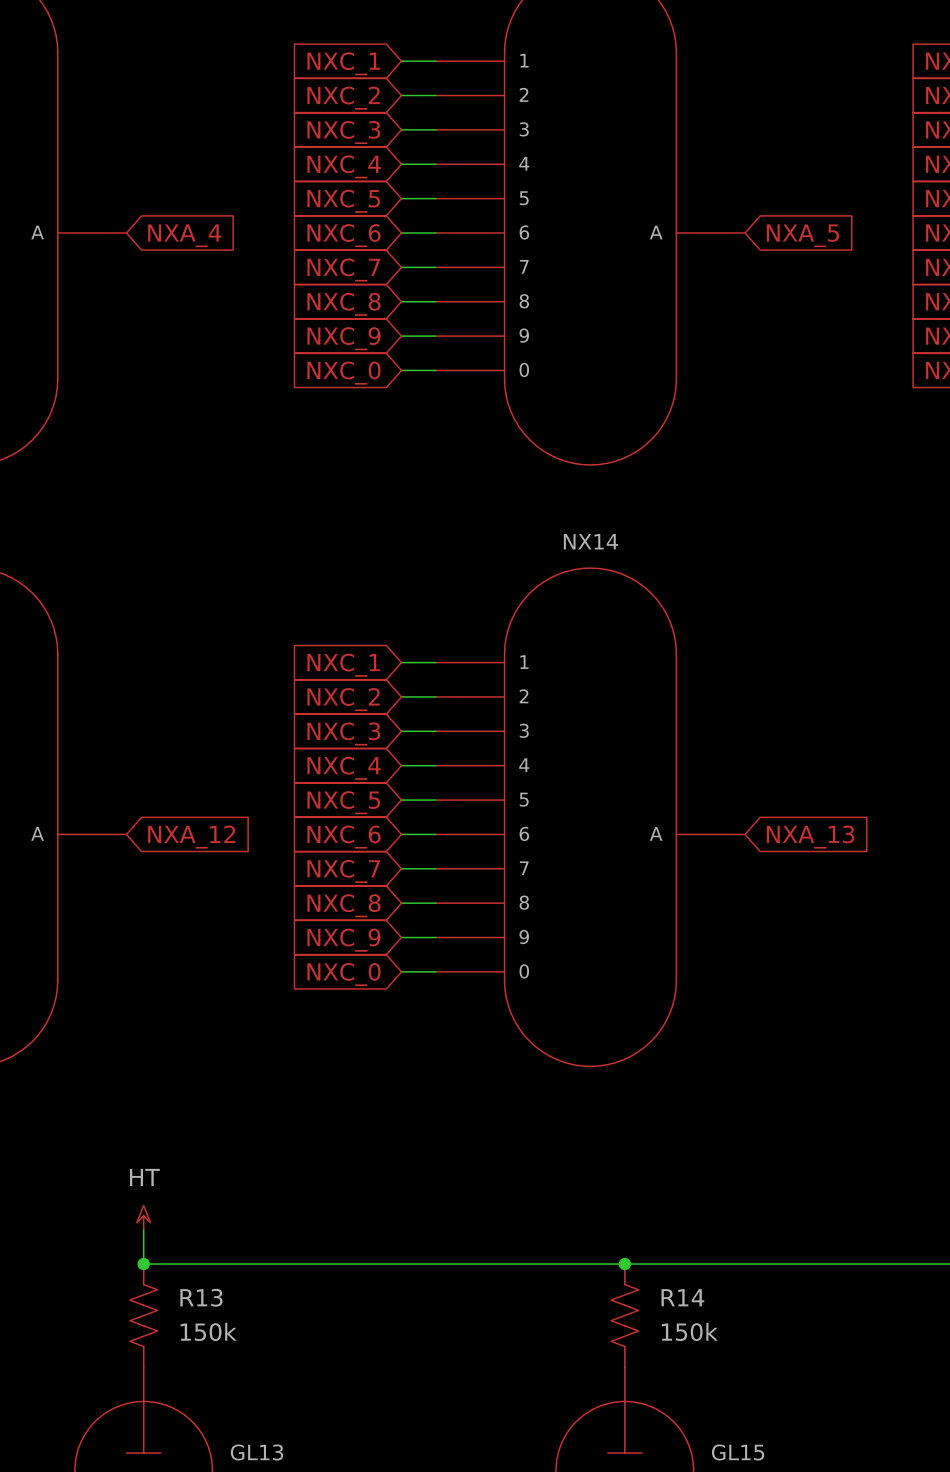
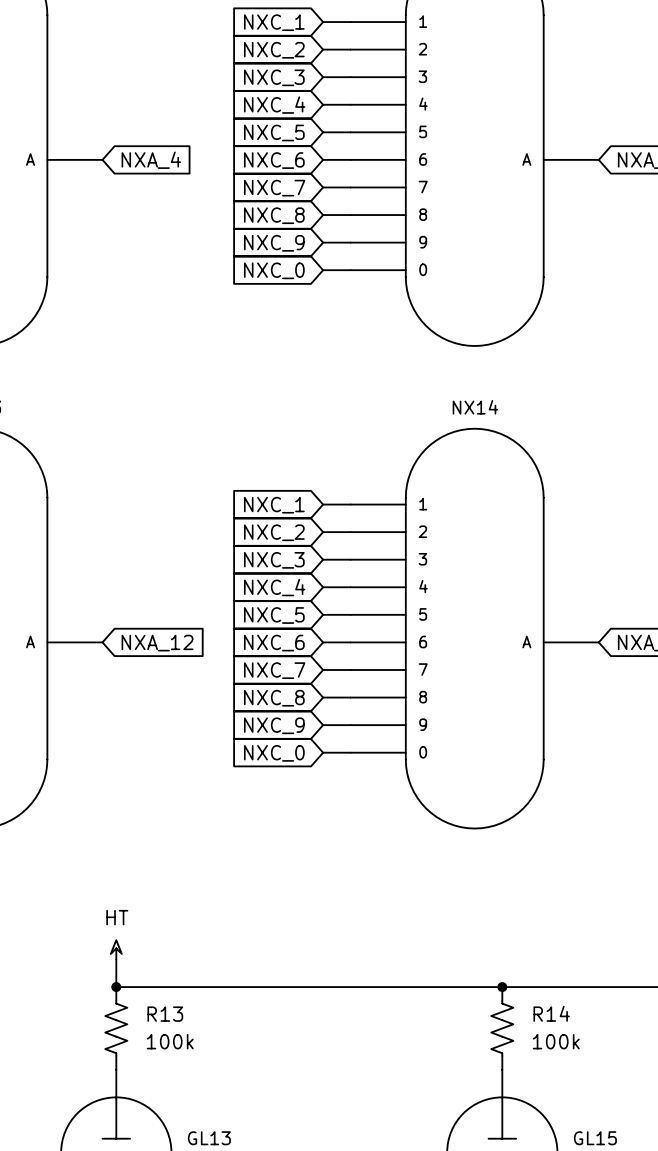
R13 value: 150k (208, 1331) -> 100k (170, 1041)
R14 value: 150k (689, 1331) -> 100k (556, 1041)

